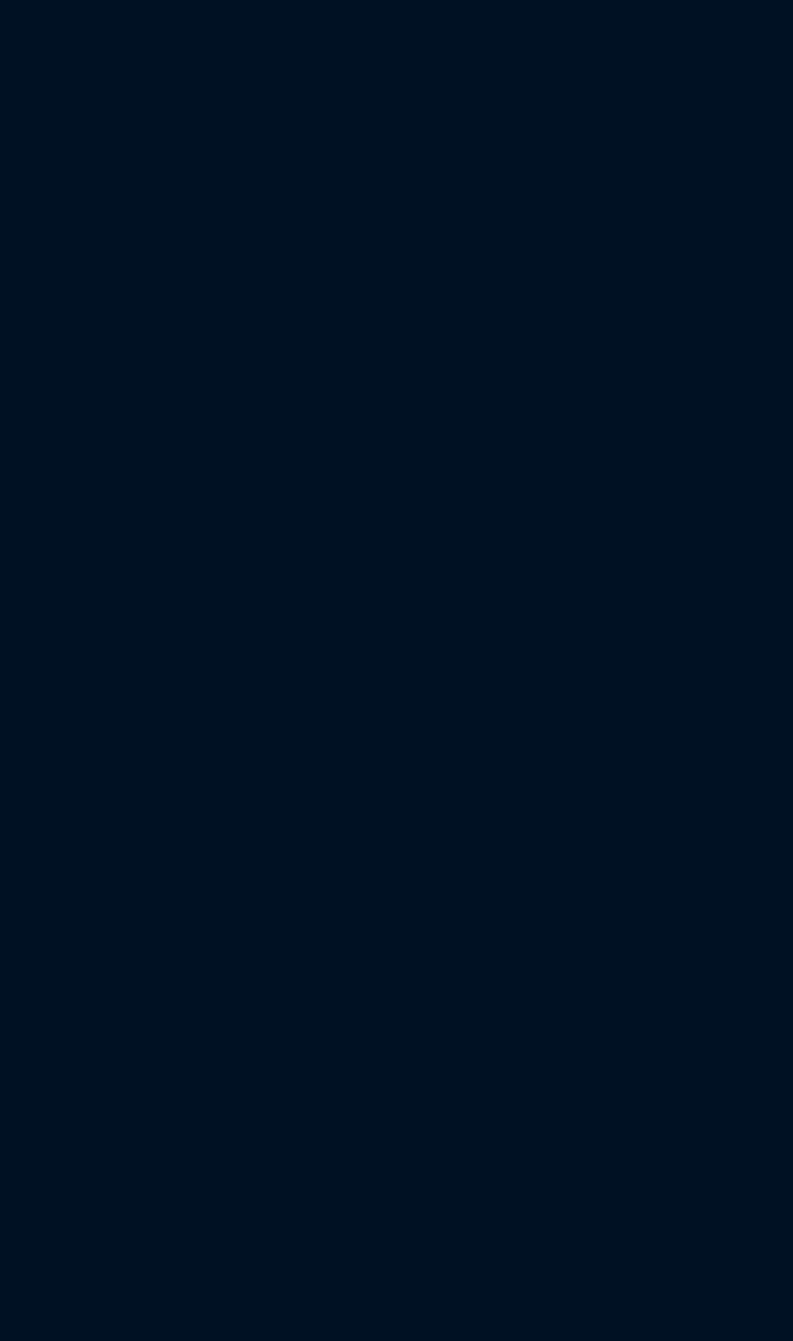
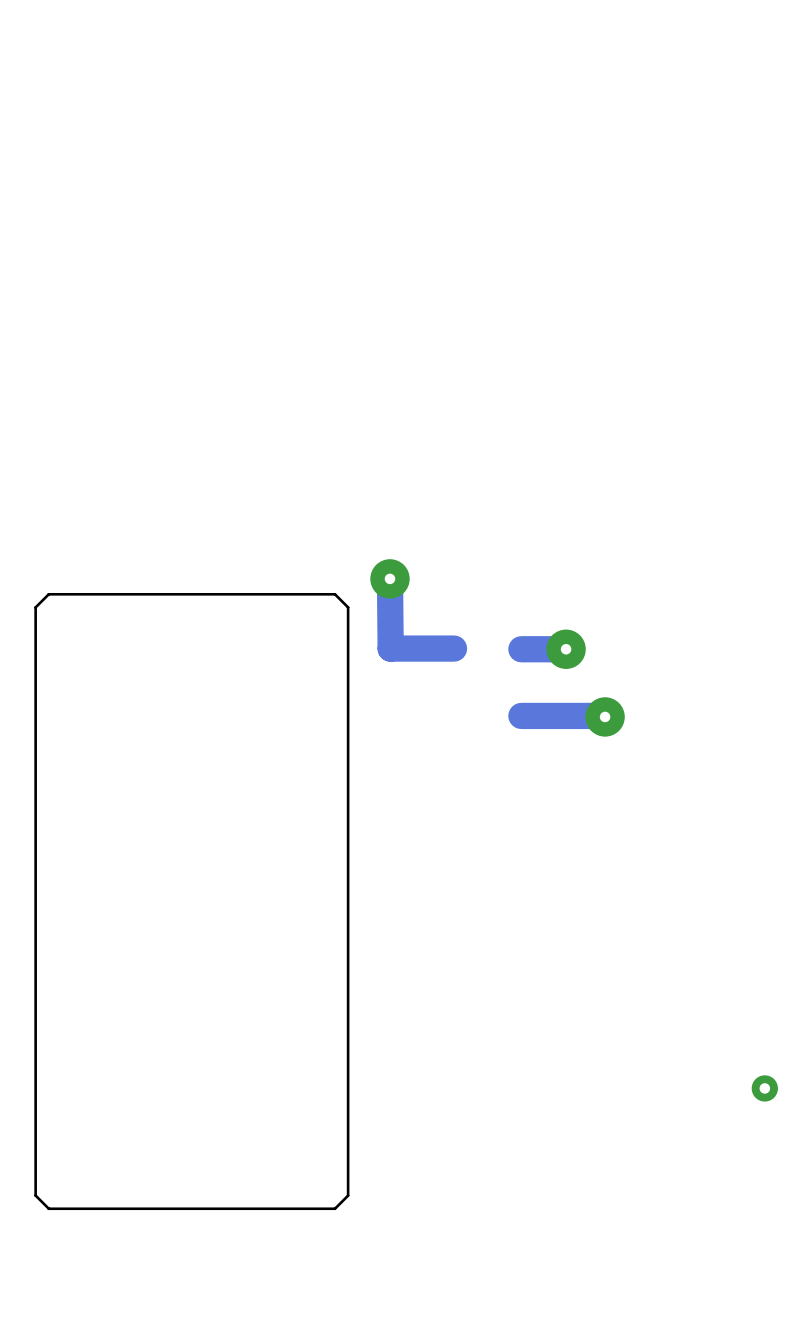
bottom track: none -> (389, 578) (390, 648) (454, 649)
via: none -> (389, 578)
bottom track: none -> (521, 649) (566, 649)
via: none -> (566, 649)
bottom track: none -> (521, 715) (605, 716)
via: none -> (605, 716)
via: none -> (764, 1088)
board edge: none -> (48, 1208) (334, 1208) (348, 1195) (348, 607) (334, 594) (48, 594) (35, 607) (35, 1195) (48, 1208)

